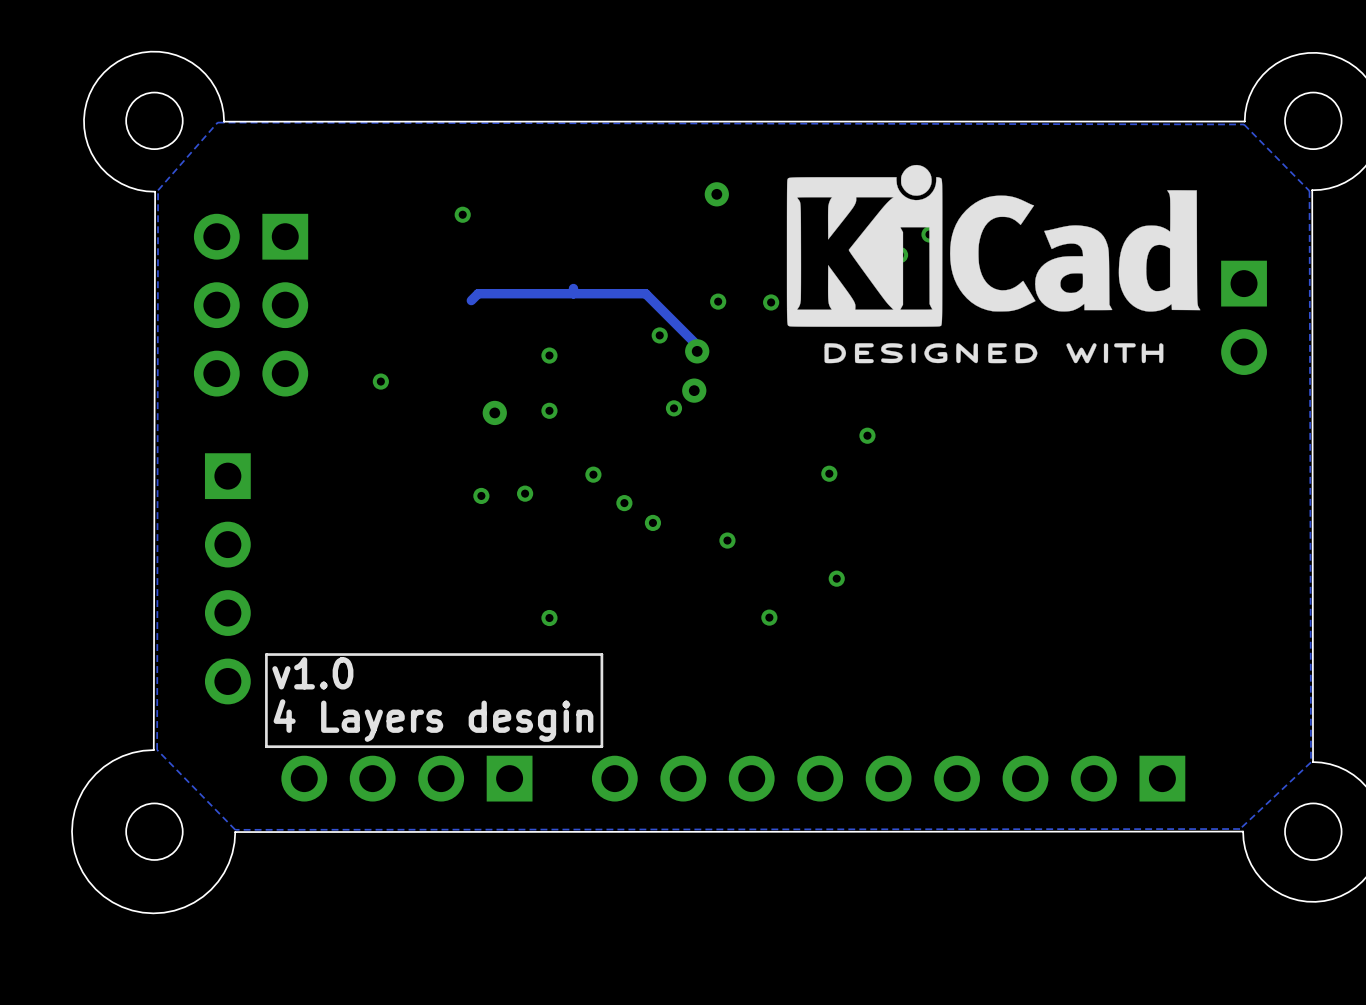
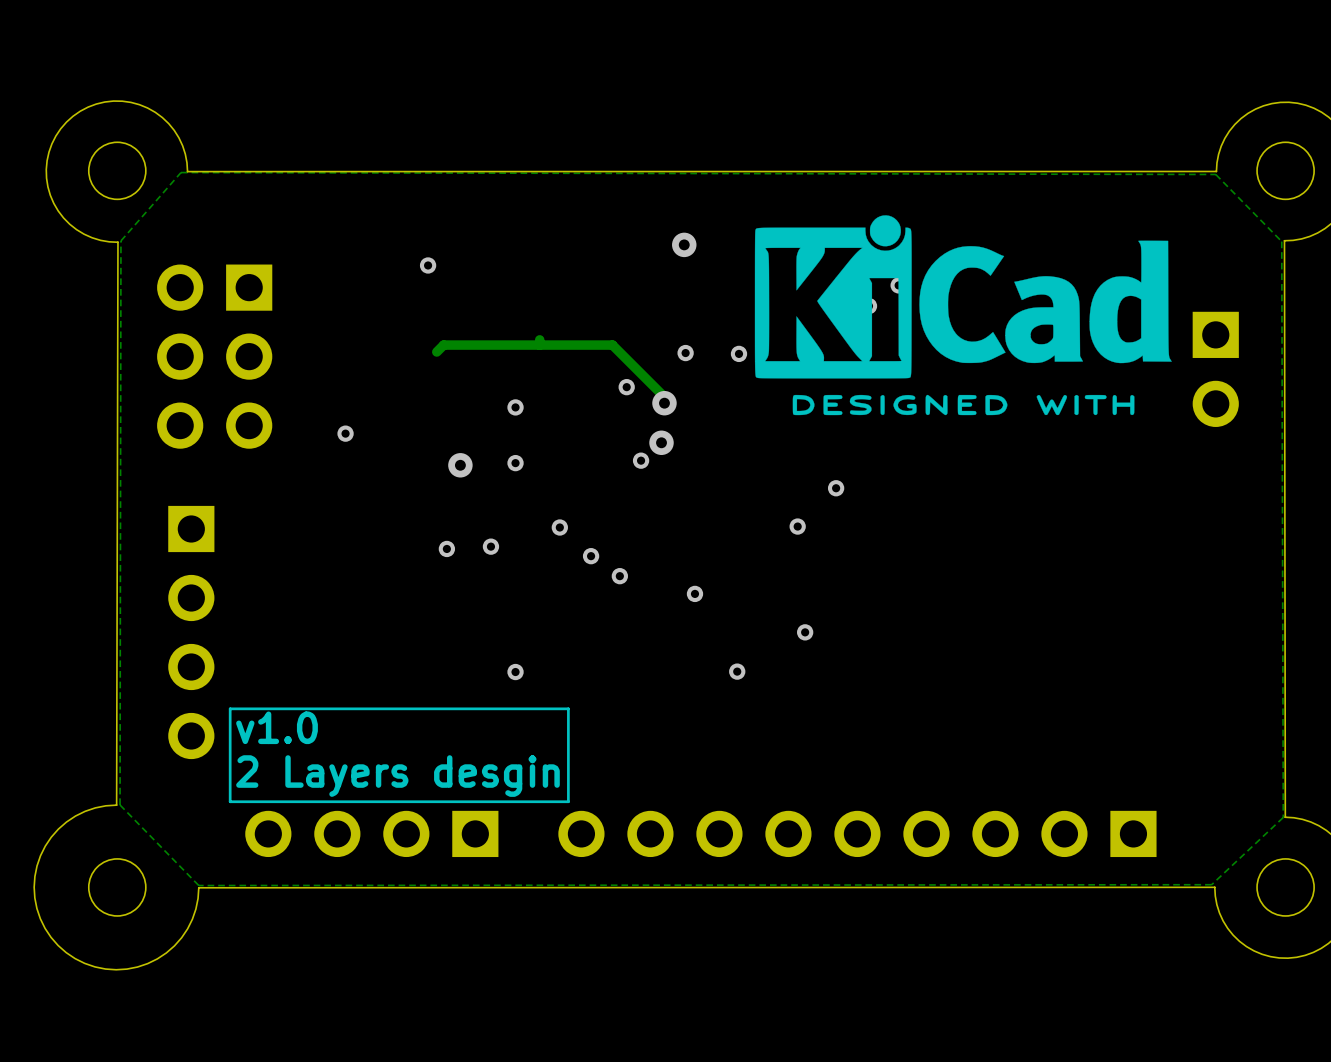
text: 4 Layers desgin (433, 720) -> 2 Layers desgin (397, 776)

